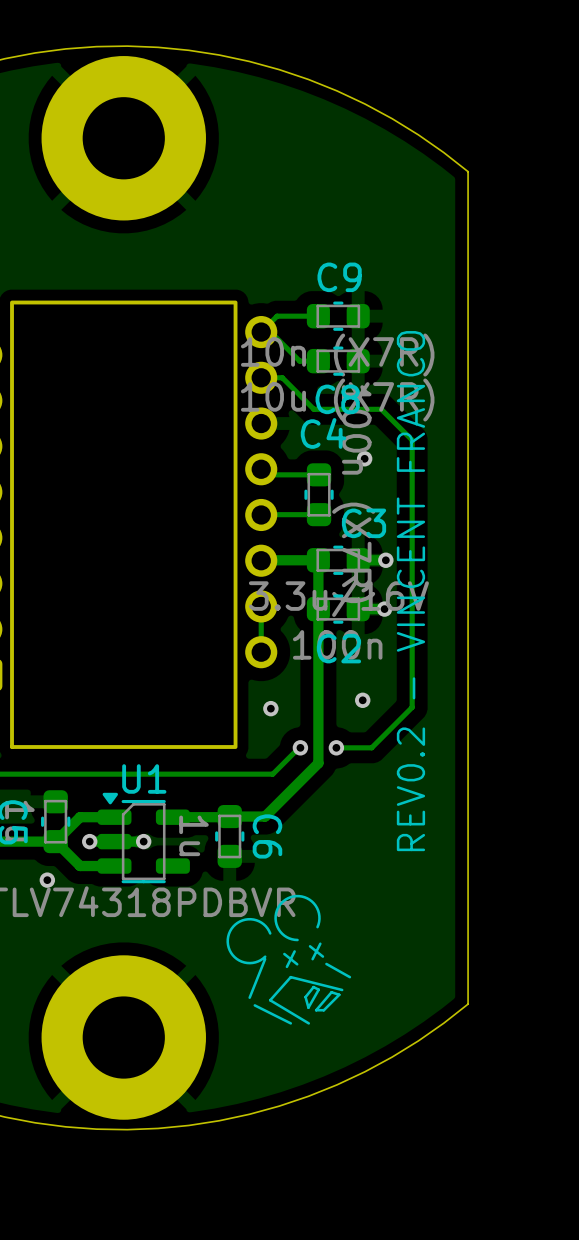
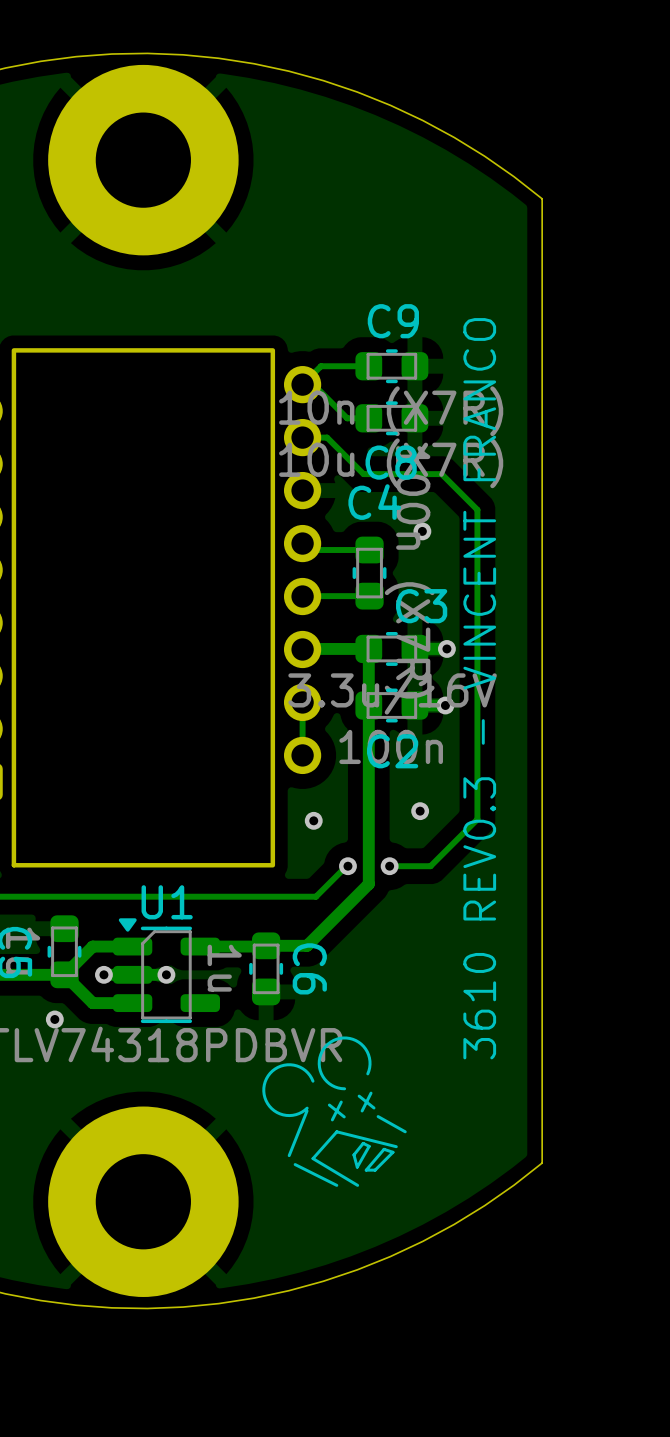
text: REV0.2 - VINCENT FRANCO (410, 591) -> 3610 REV0.3 - VINCENT FRANCO (479, 688)

